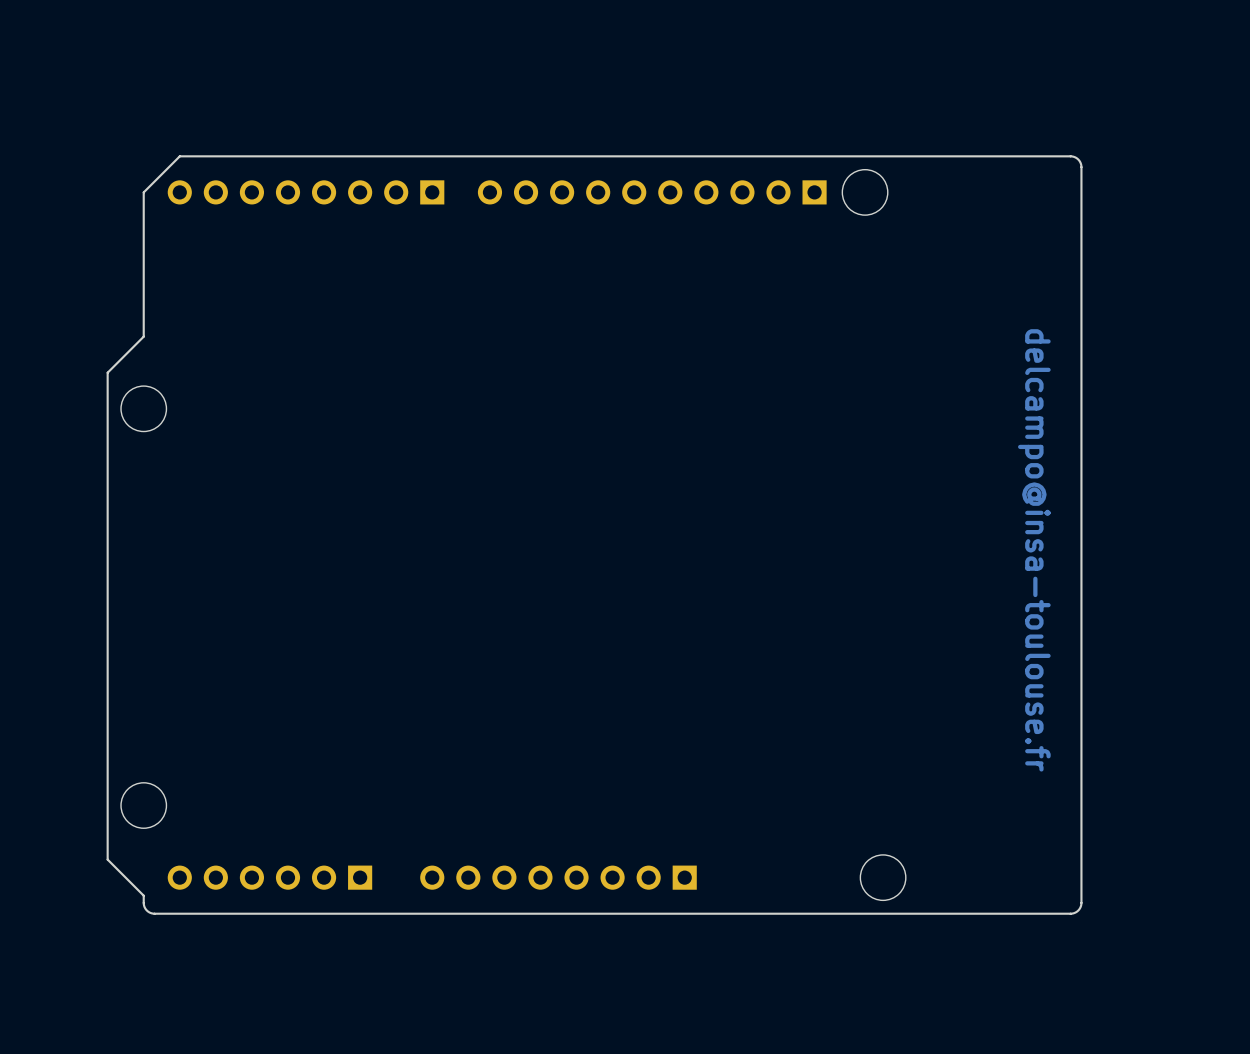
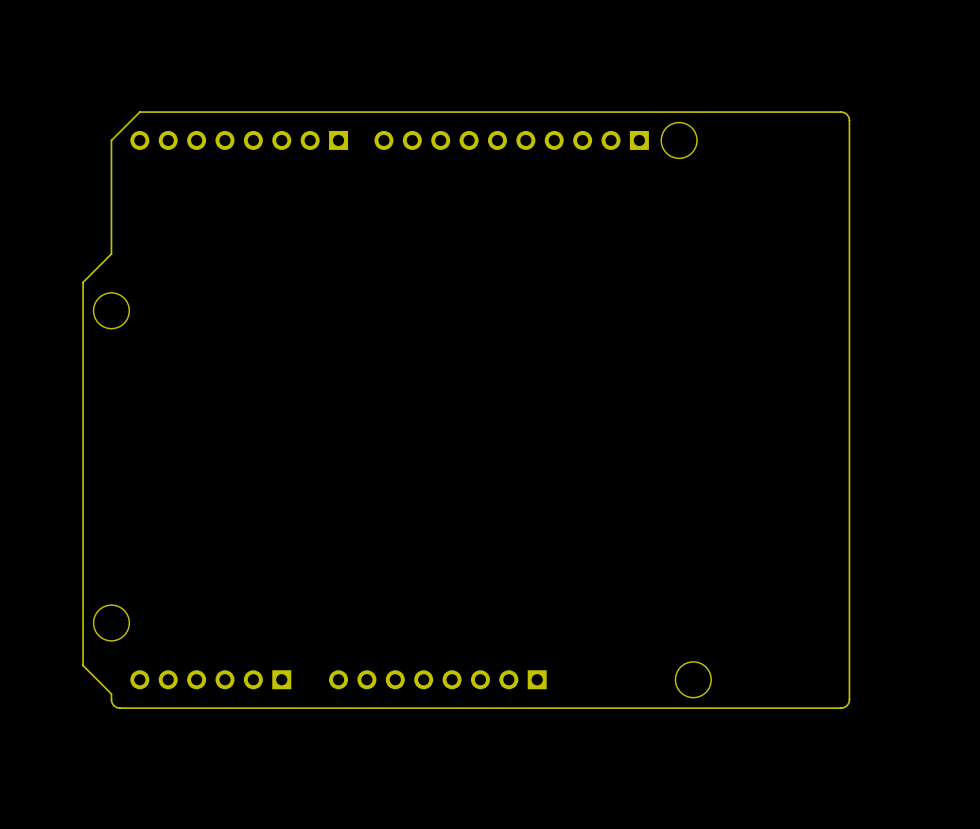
text: delcampo@insa-toulouse.fr (1034, 550) -> none

